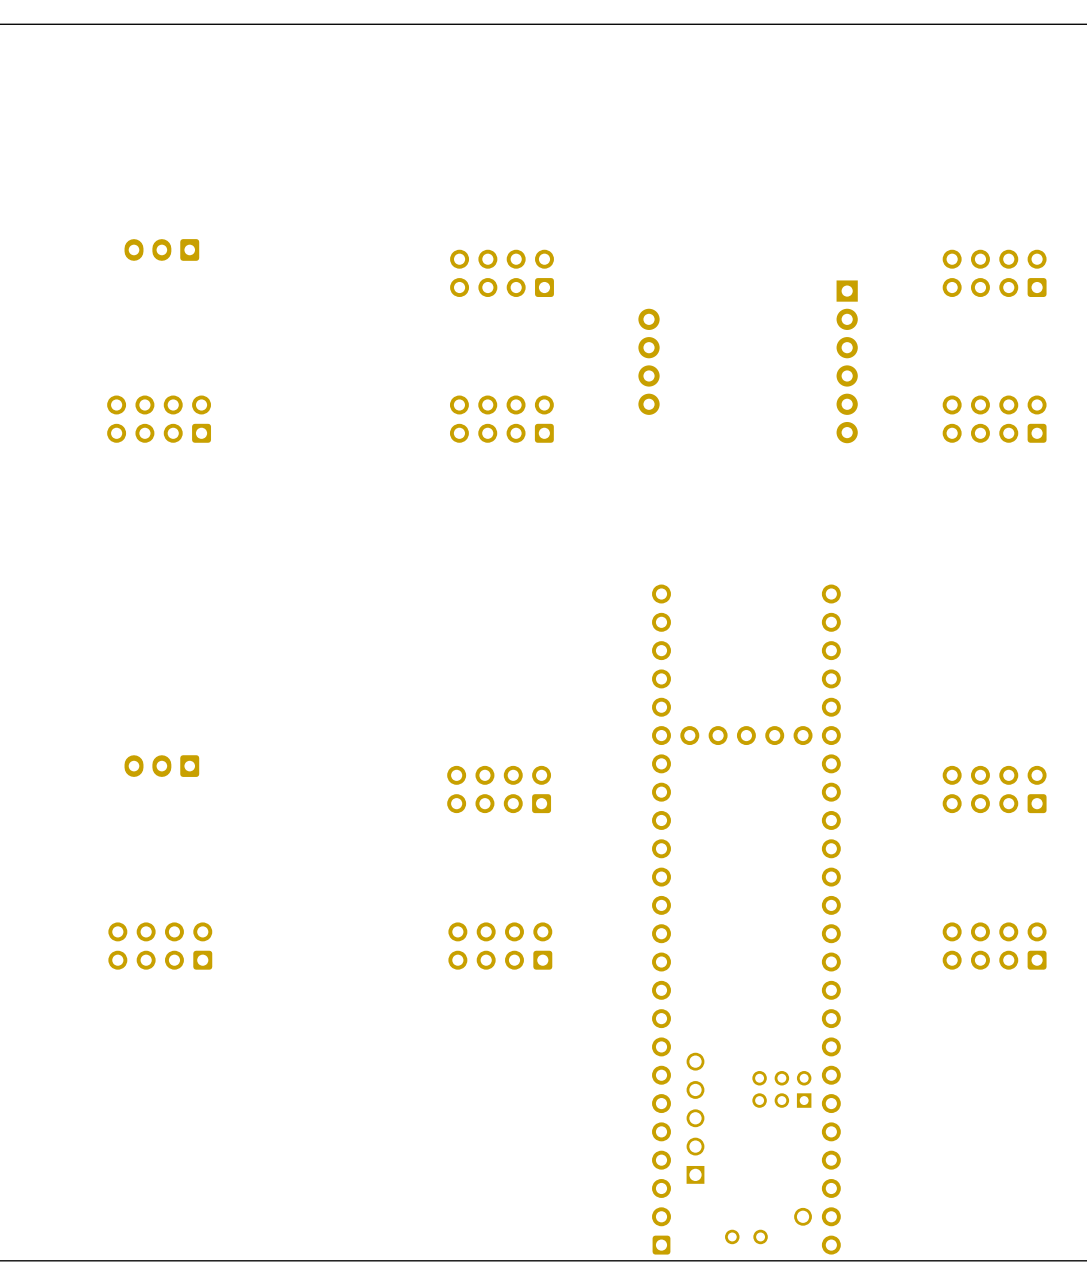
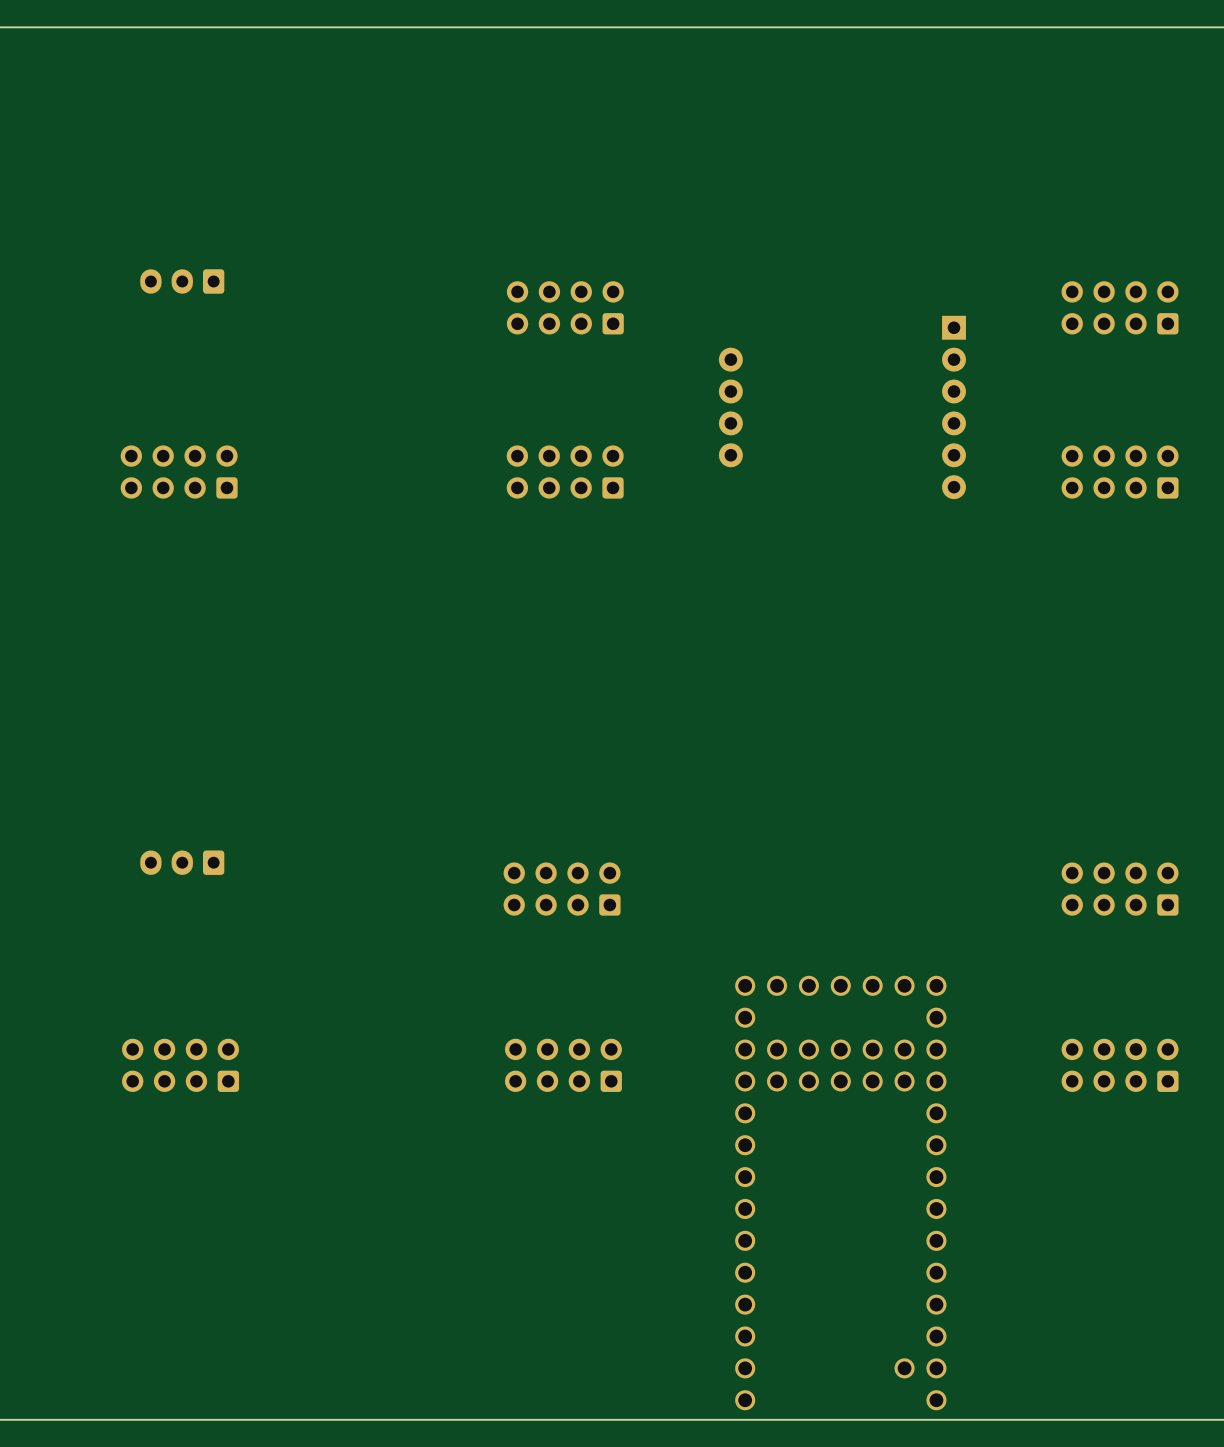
part: (746, 919) -> none
part: none -> (840, 1193)

